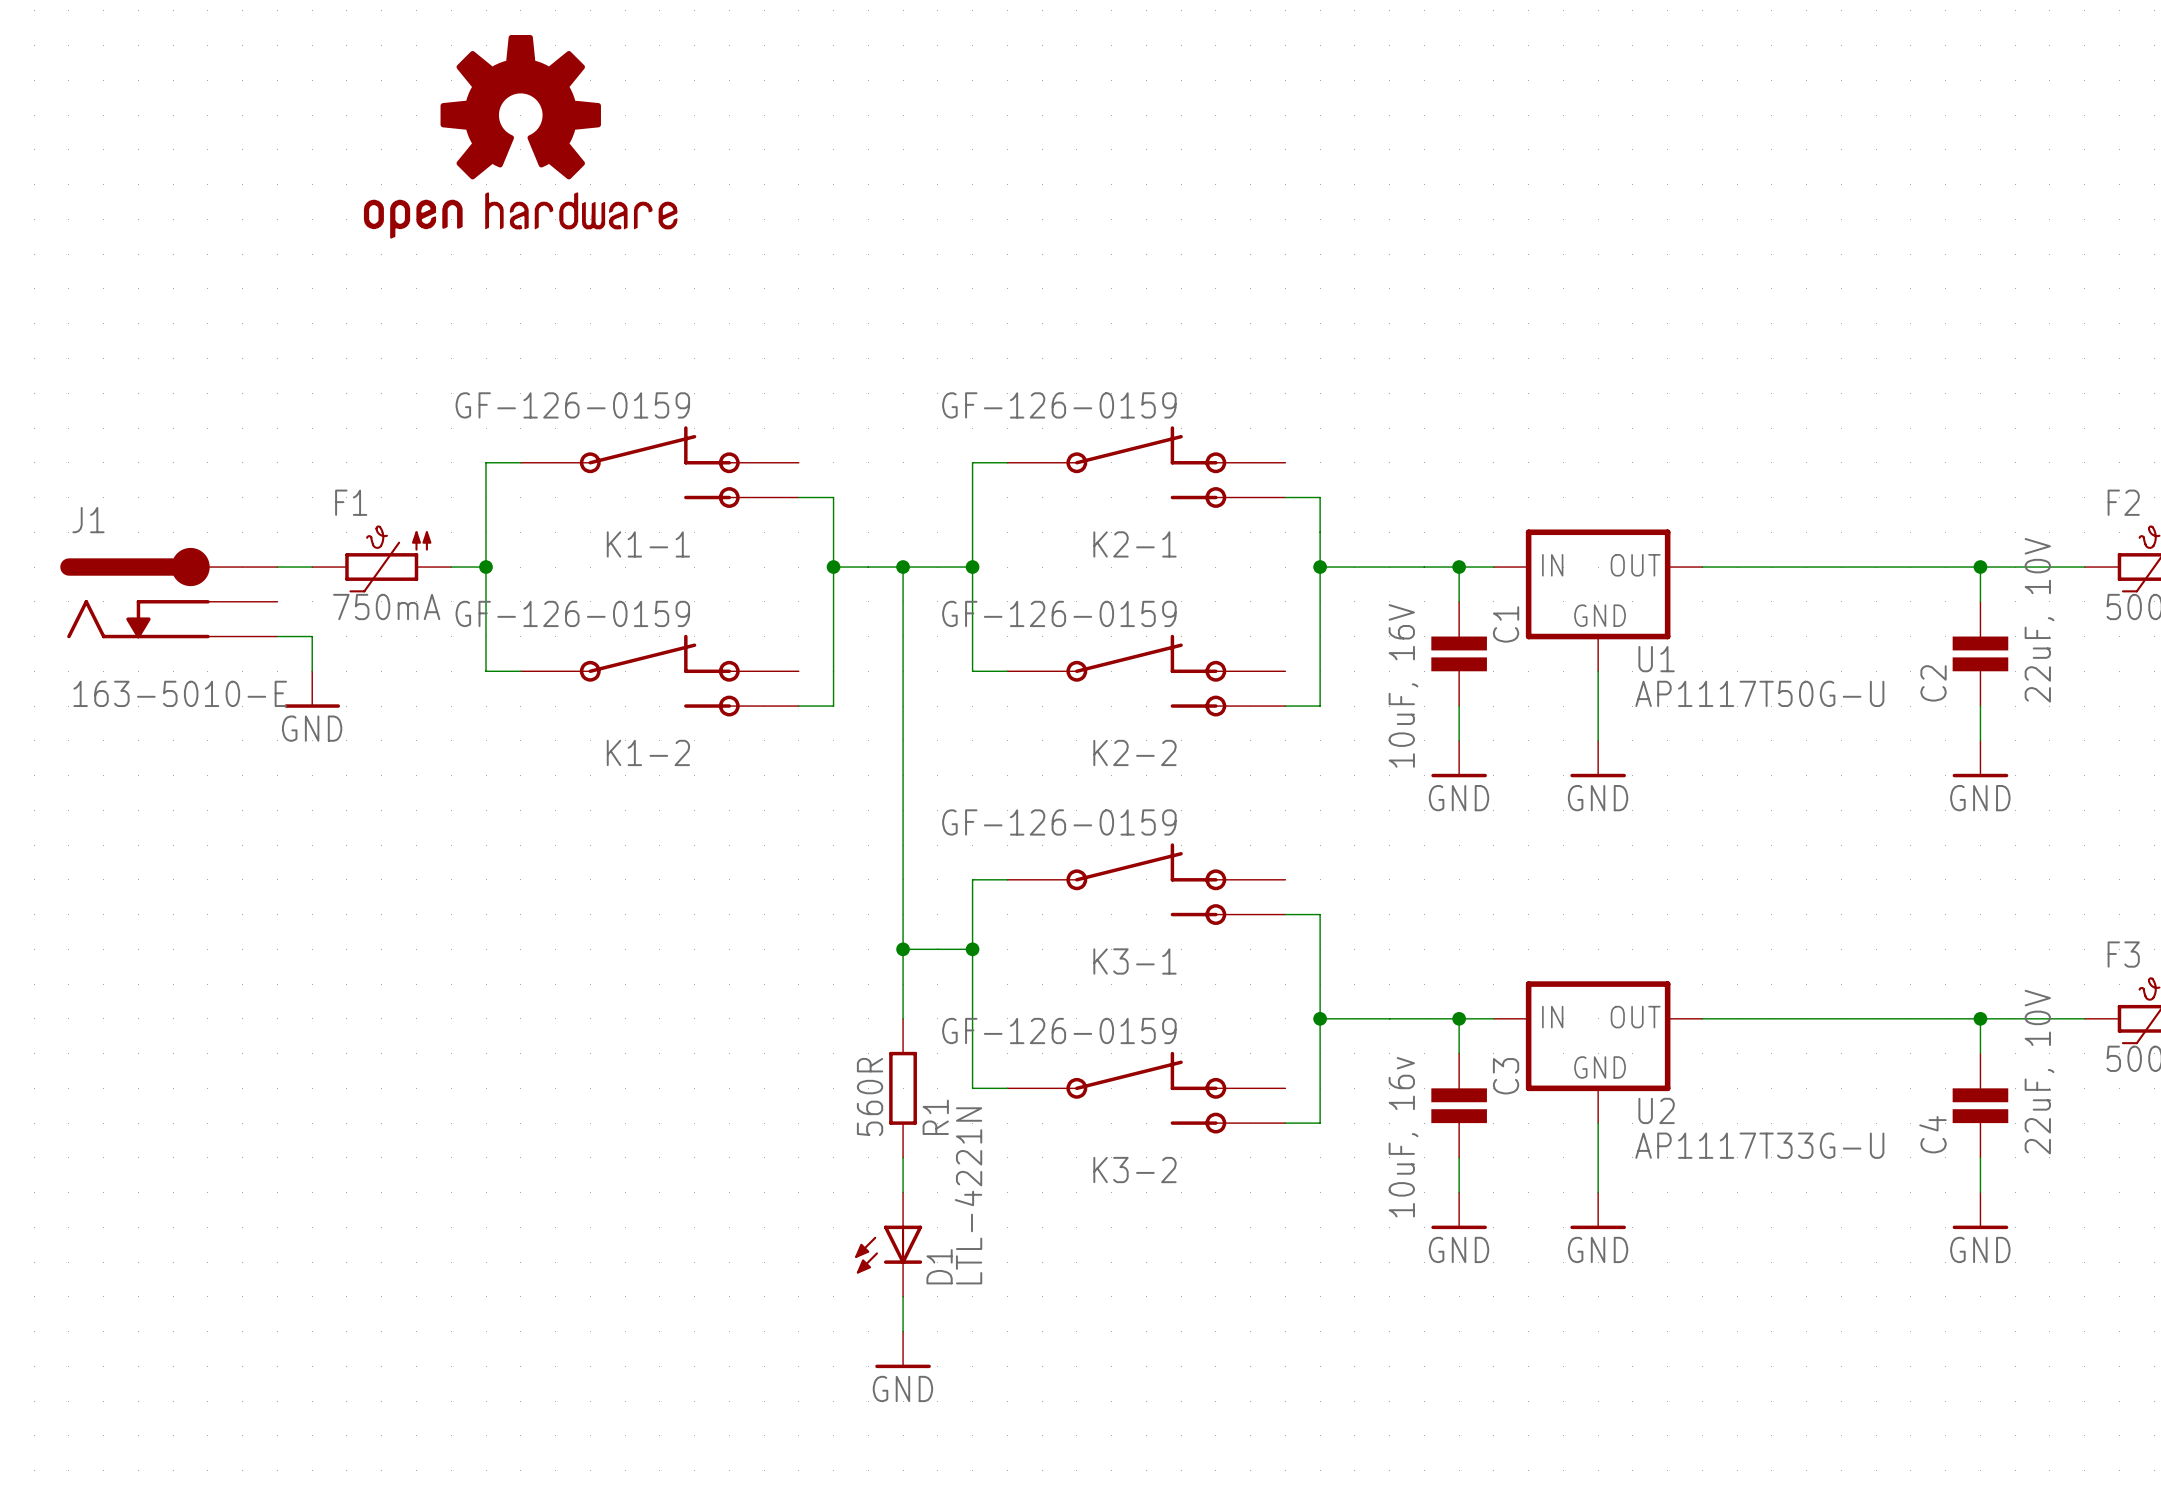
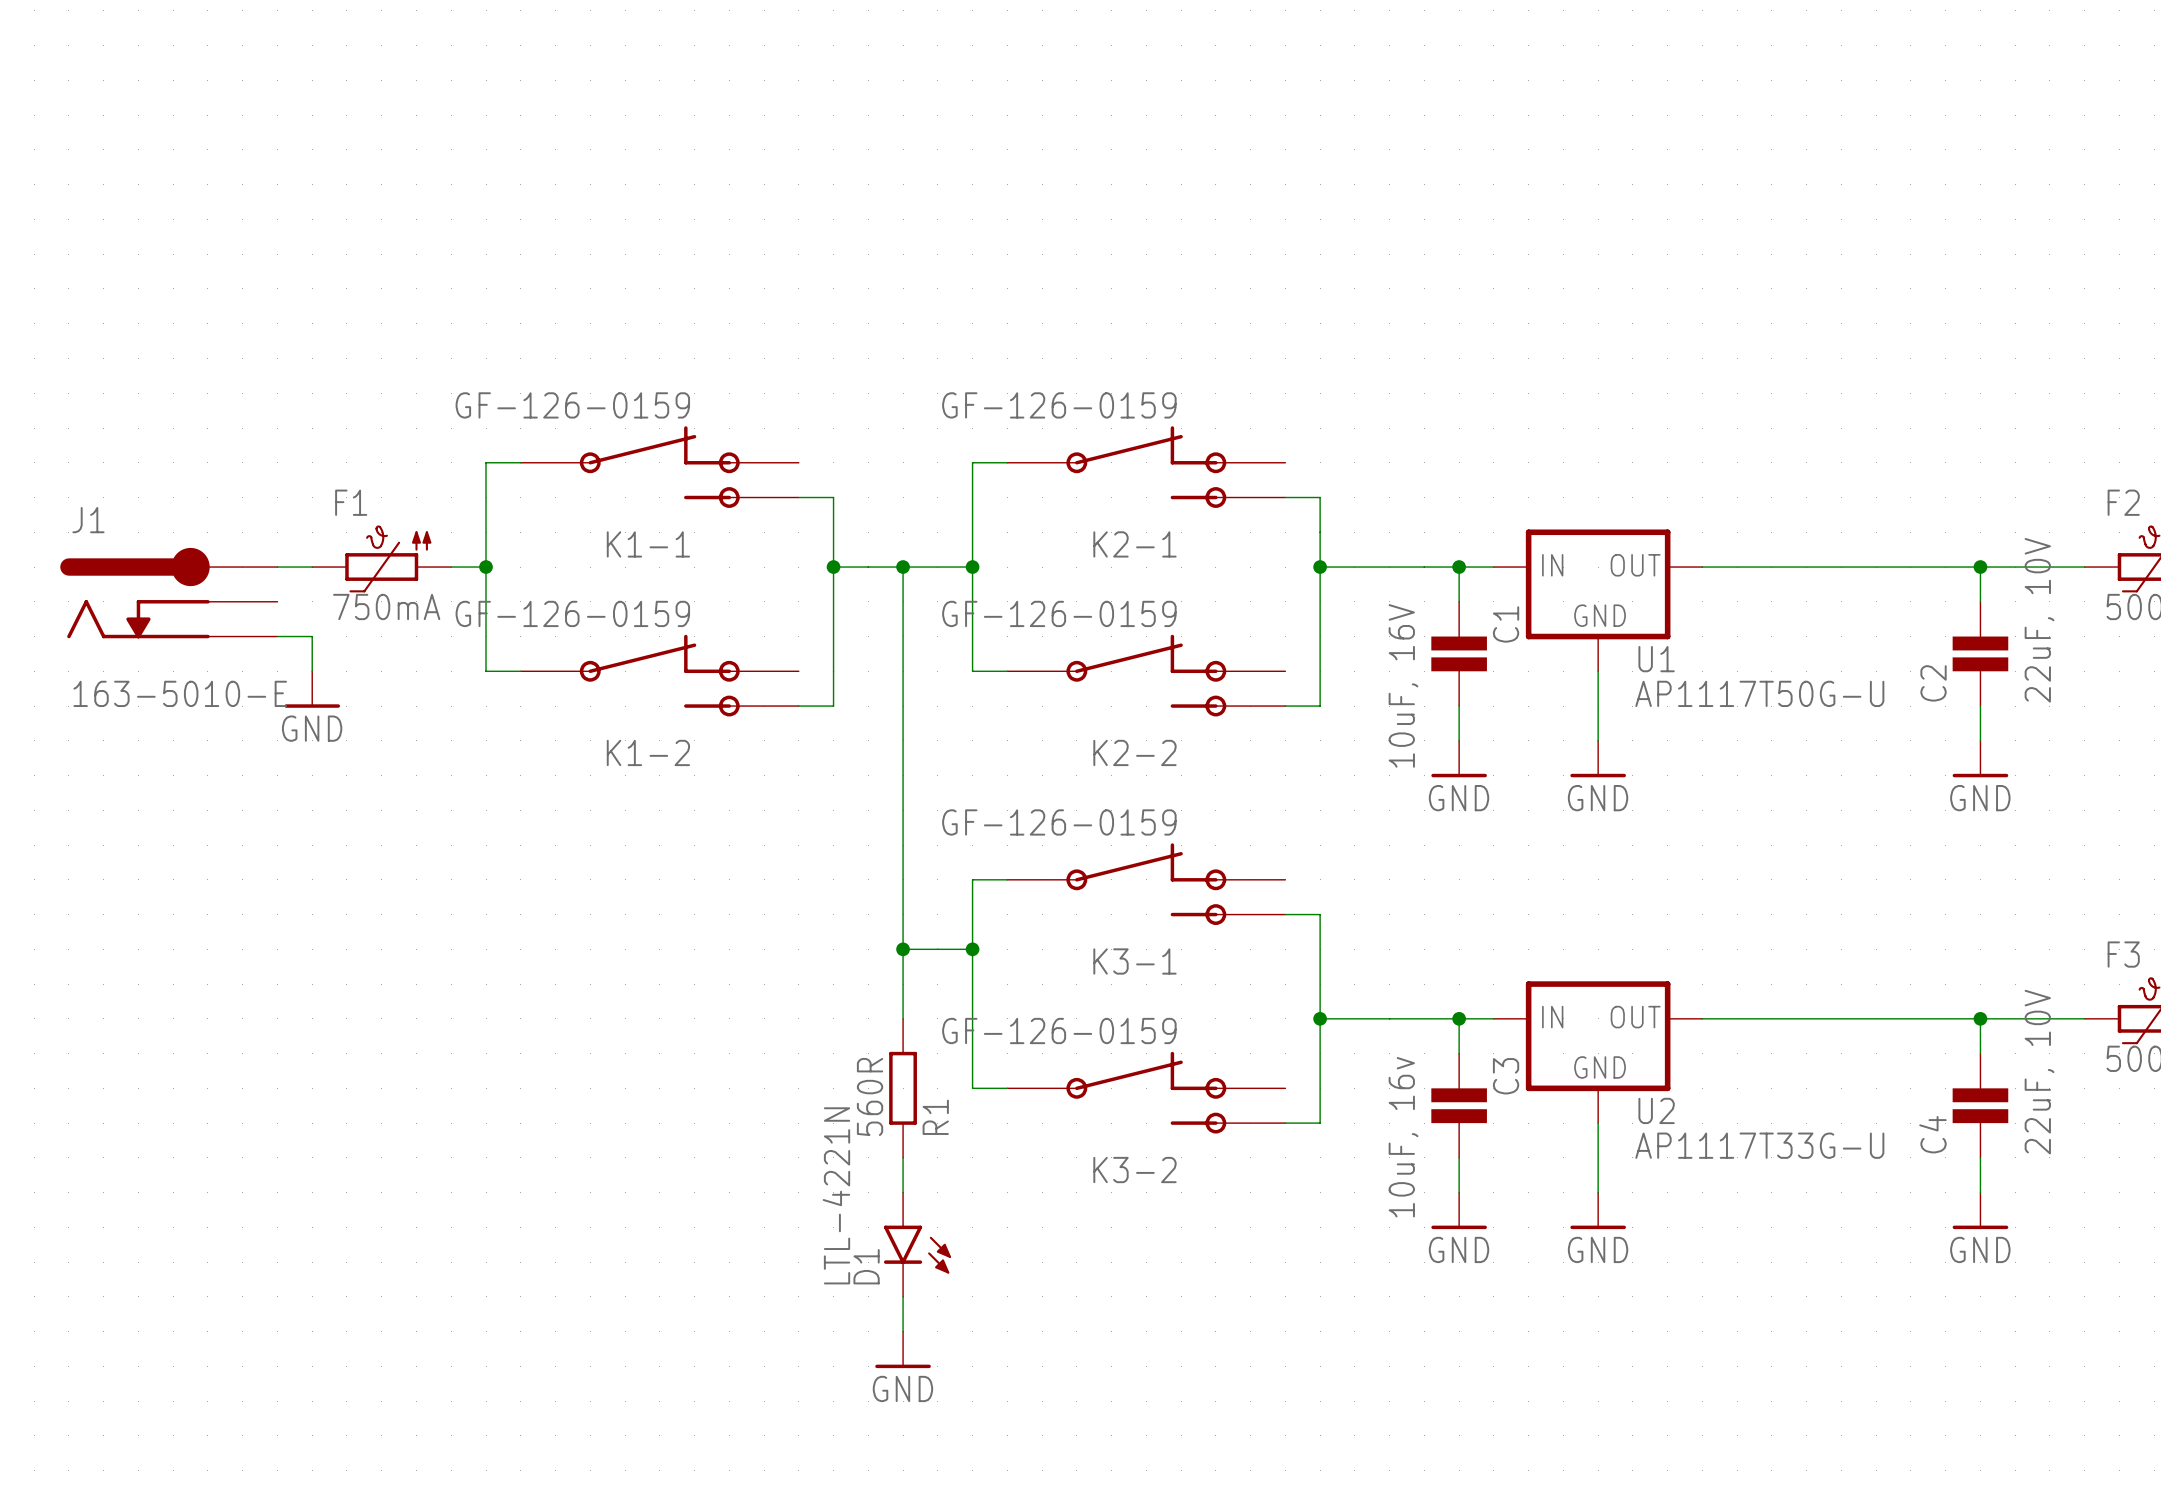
part: (520, 136) -> none
D1 symbol: [855, 1192, 923, 1297] -> [883, 1192, 952, 1297]
D1 value position: LTL-4221N (968, 1195) -> LTL-4221N (836, 1195)
D1 name position: D1 (939, 1266) -> D1 (866, 1266)

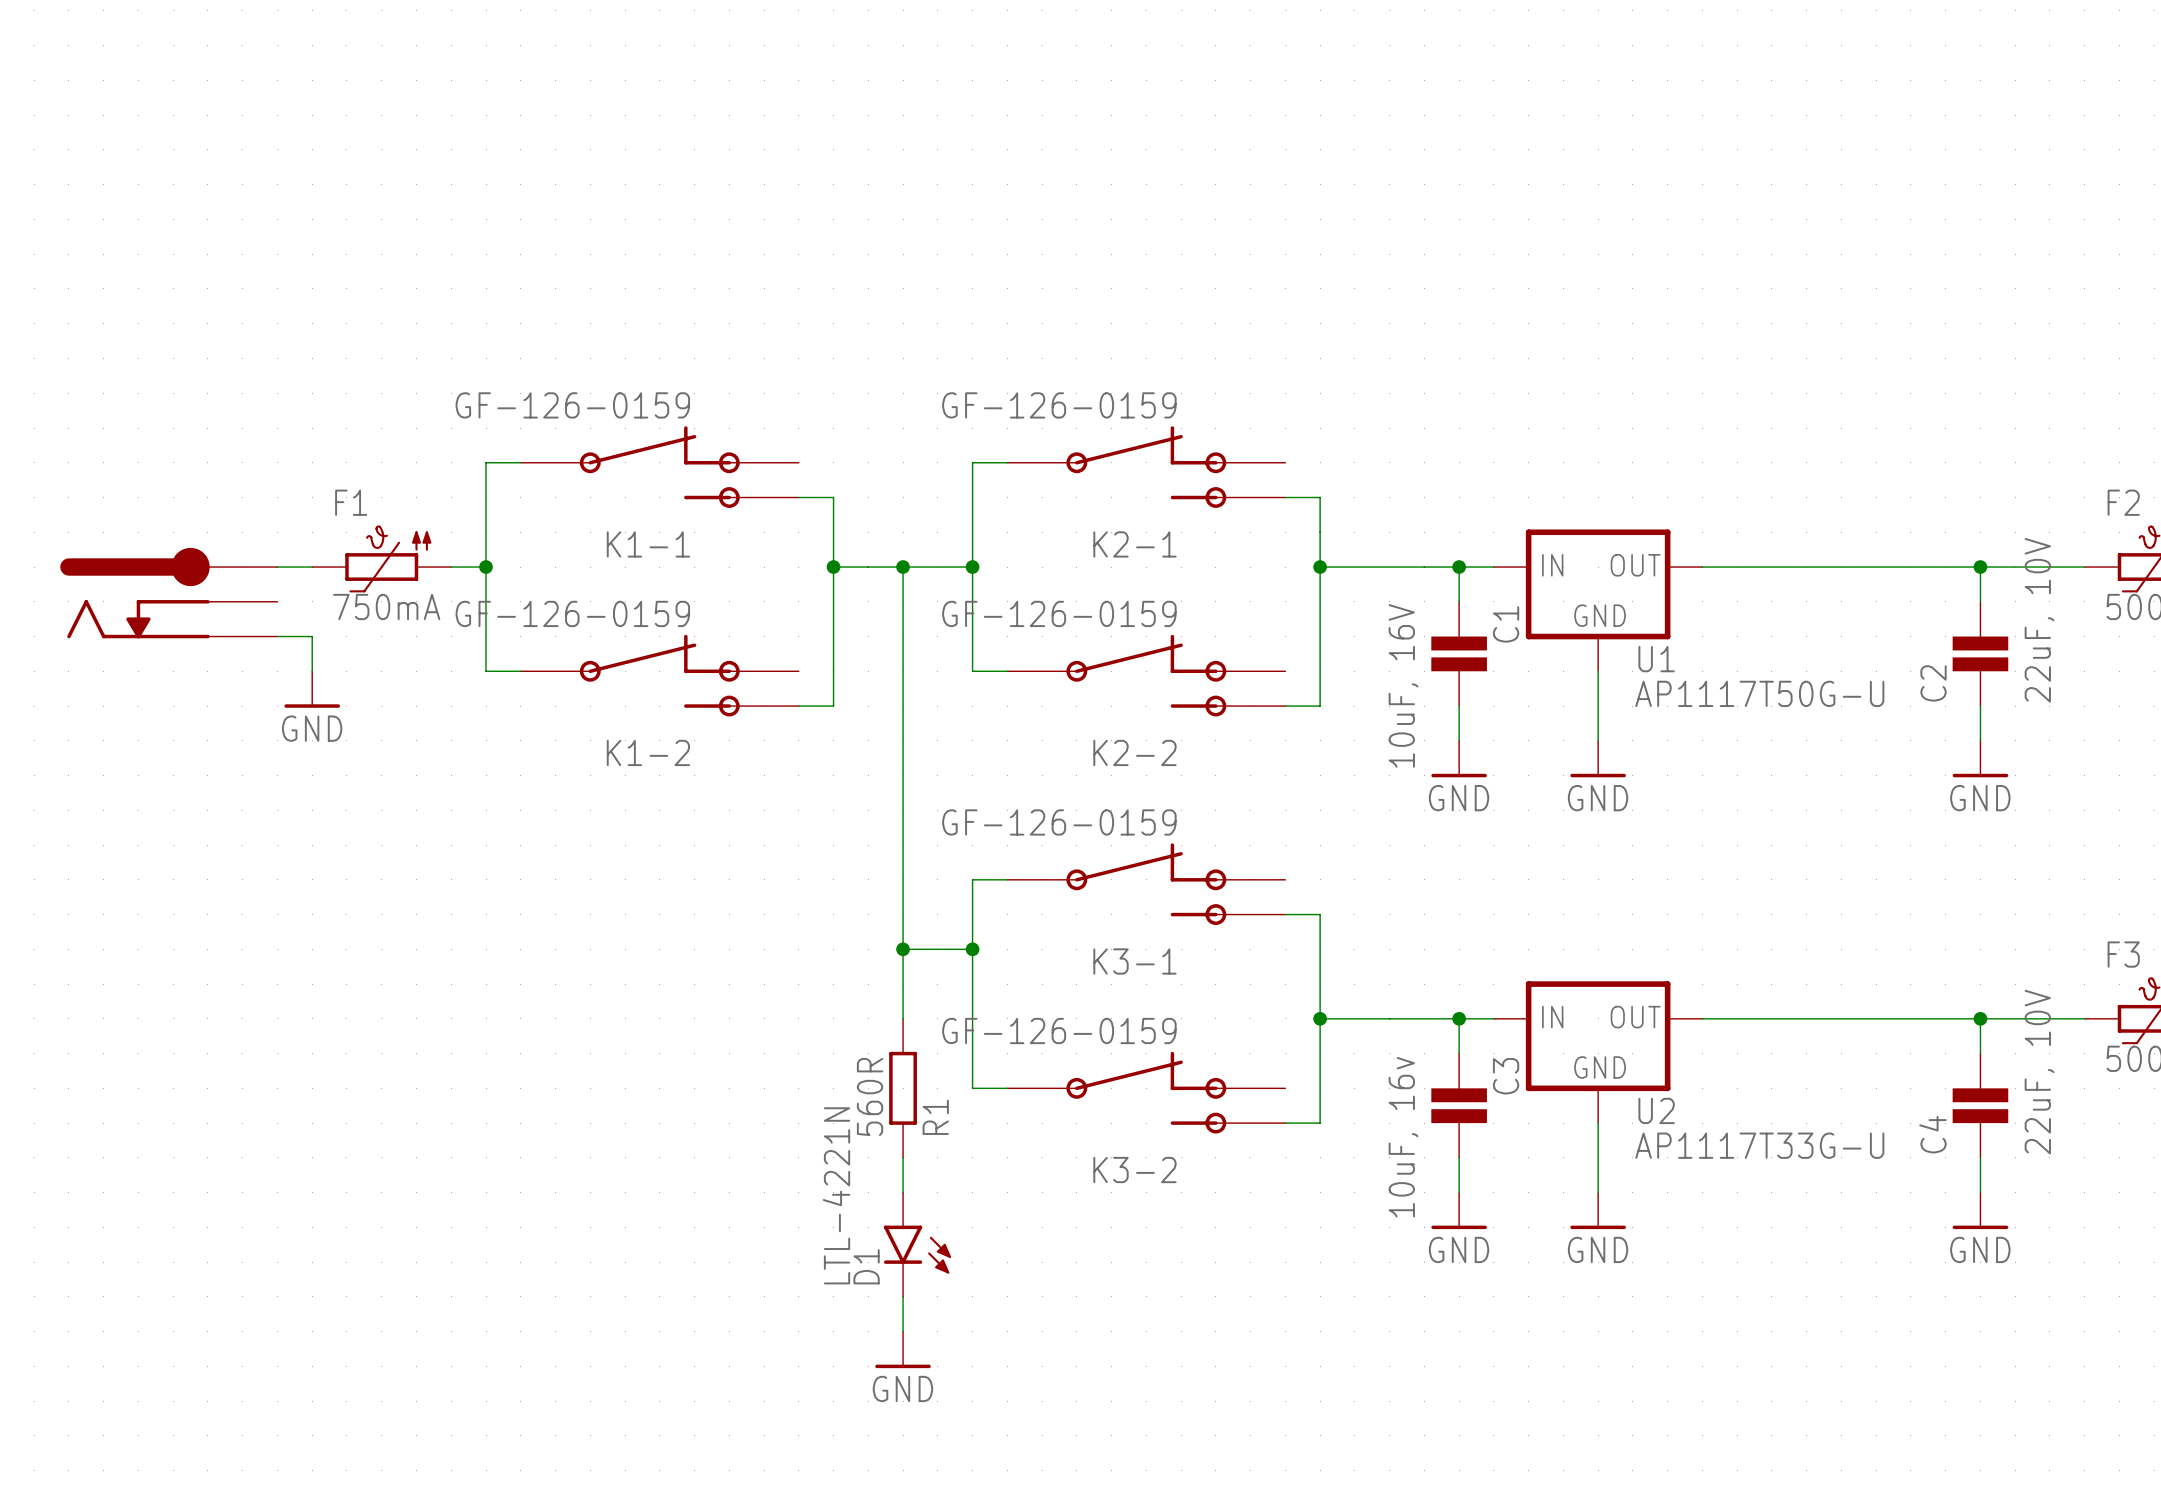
J1 name: J1 (88, 520) -> none
J1 value: 163-5010-E (180, 693) -> none

